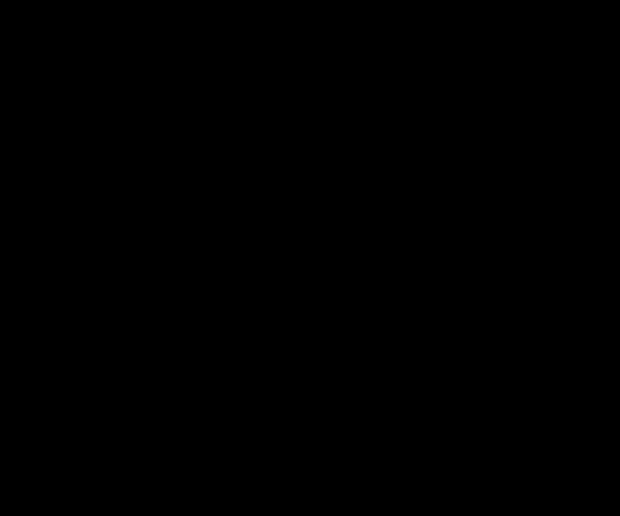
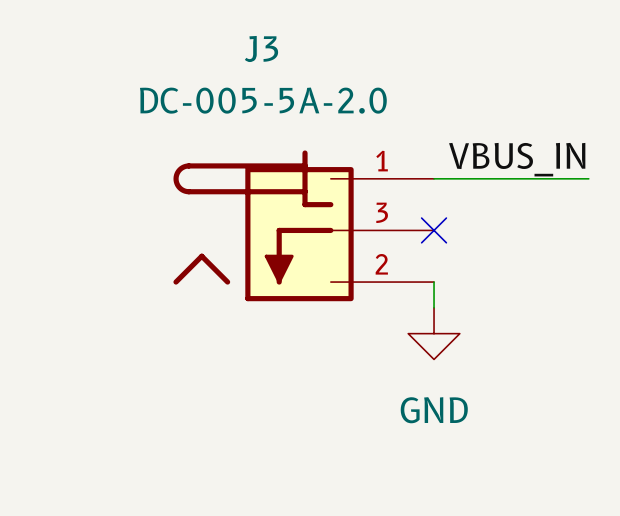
label: none -> VBUS_IN (517, 159)
wire: none -> (434, 178) (588, 178)
J3: none -> DC-005-5A-2.0 (303, 225)
no-connect mark: none -> (434, 230)
wire: none -> (434, 282) (434, 307)
power symbol: none -> GND (434, 333)

